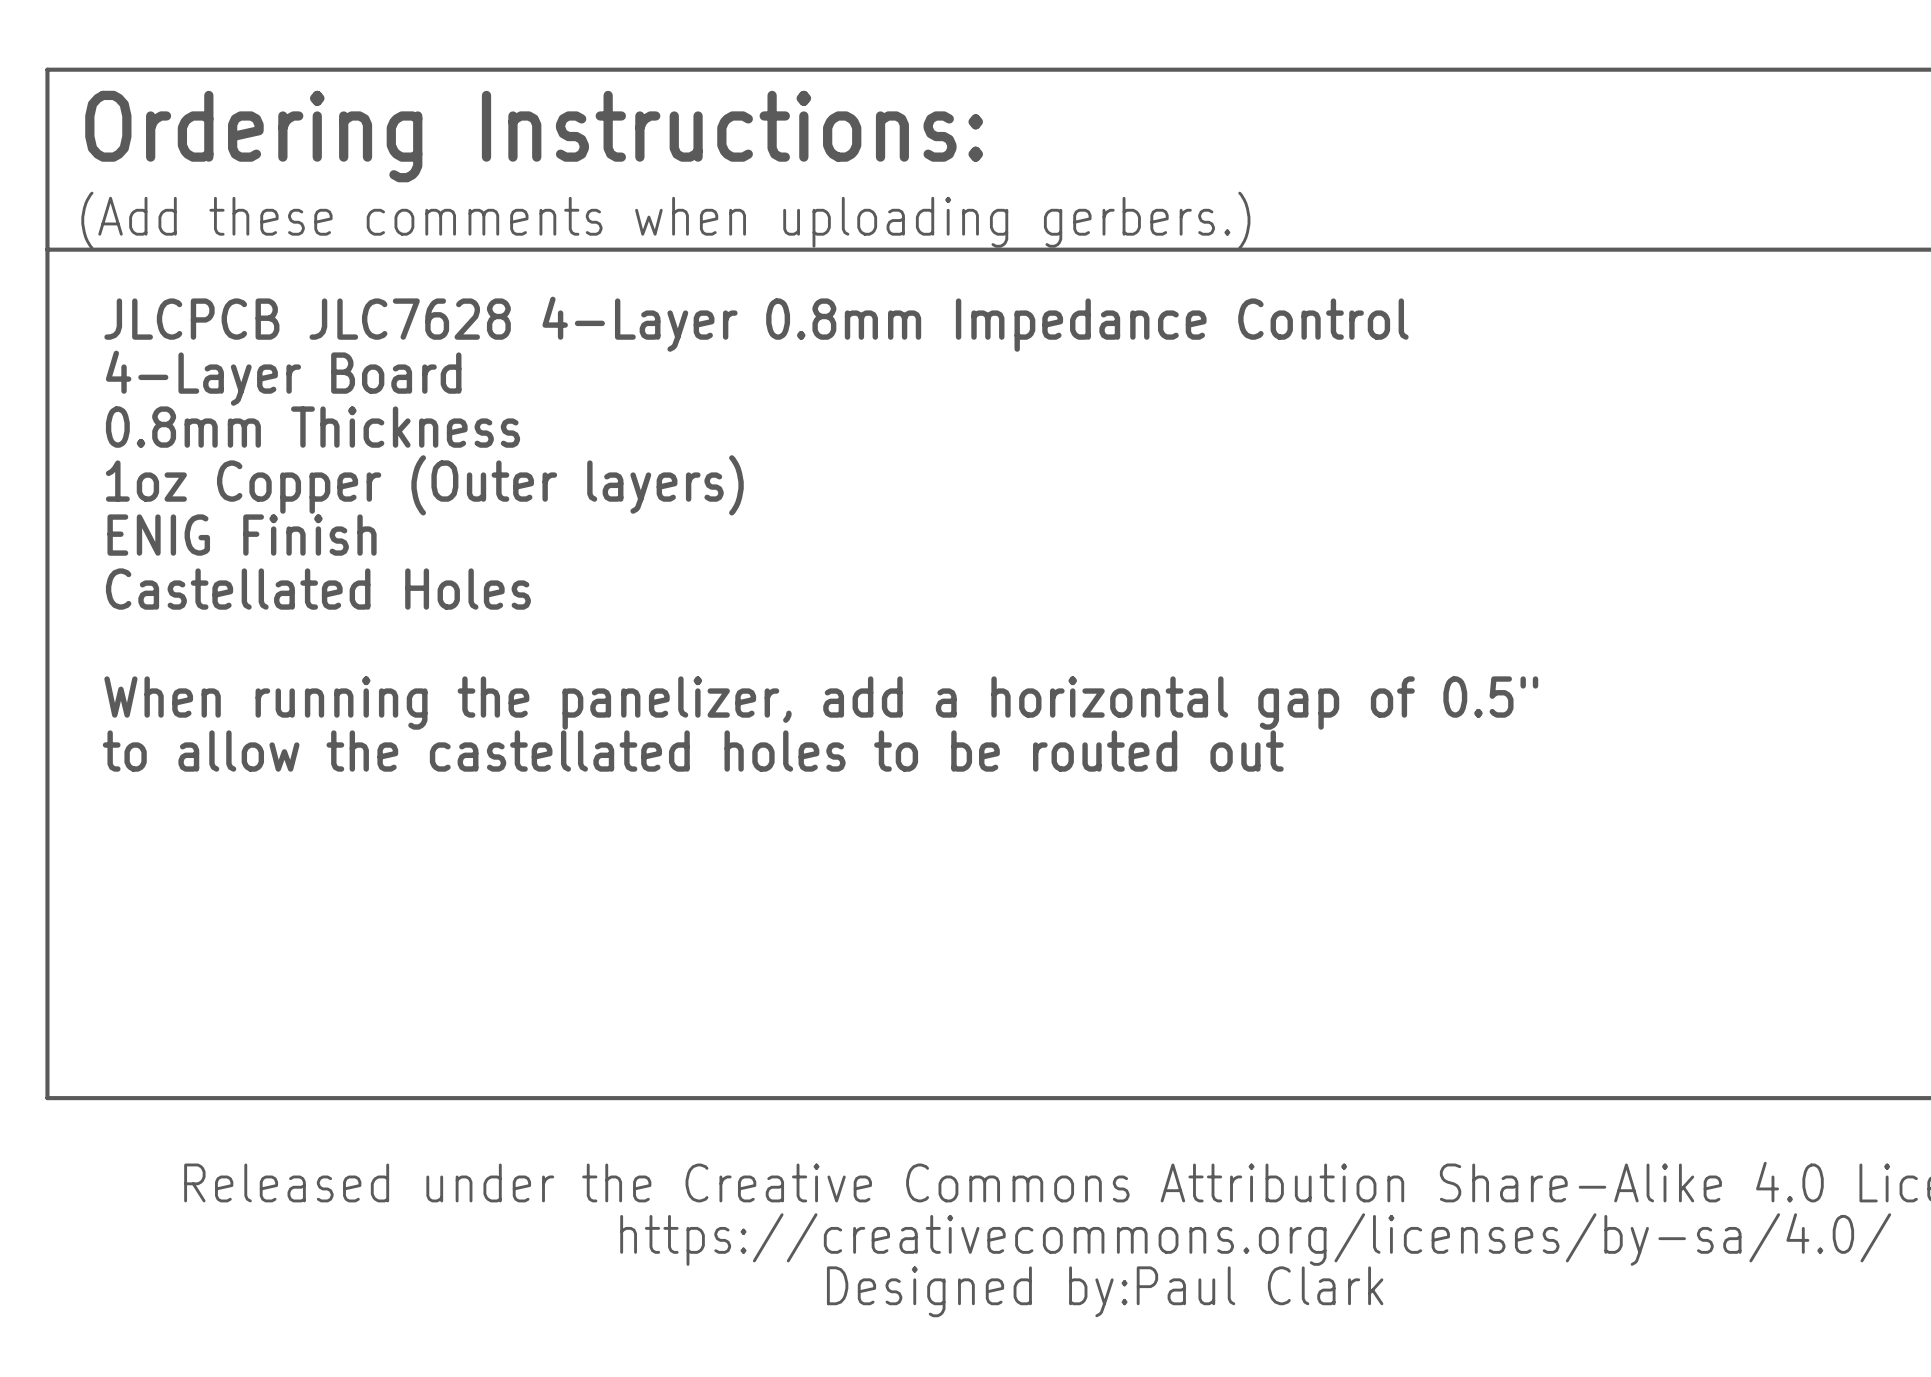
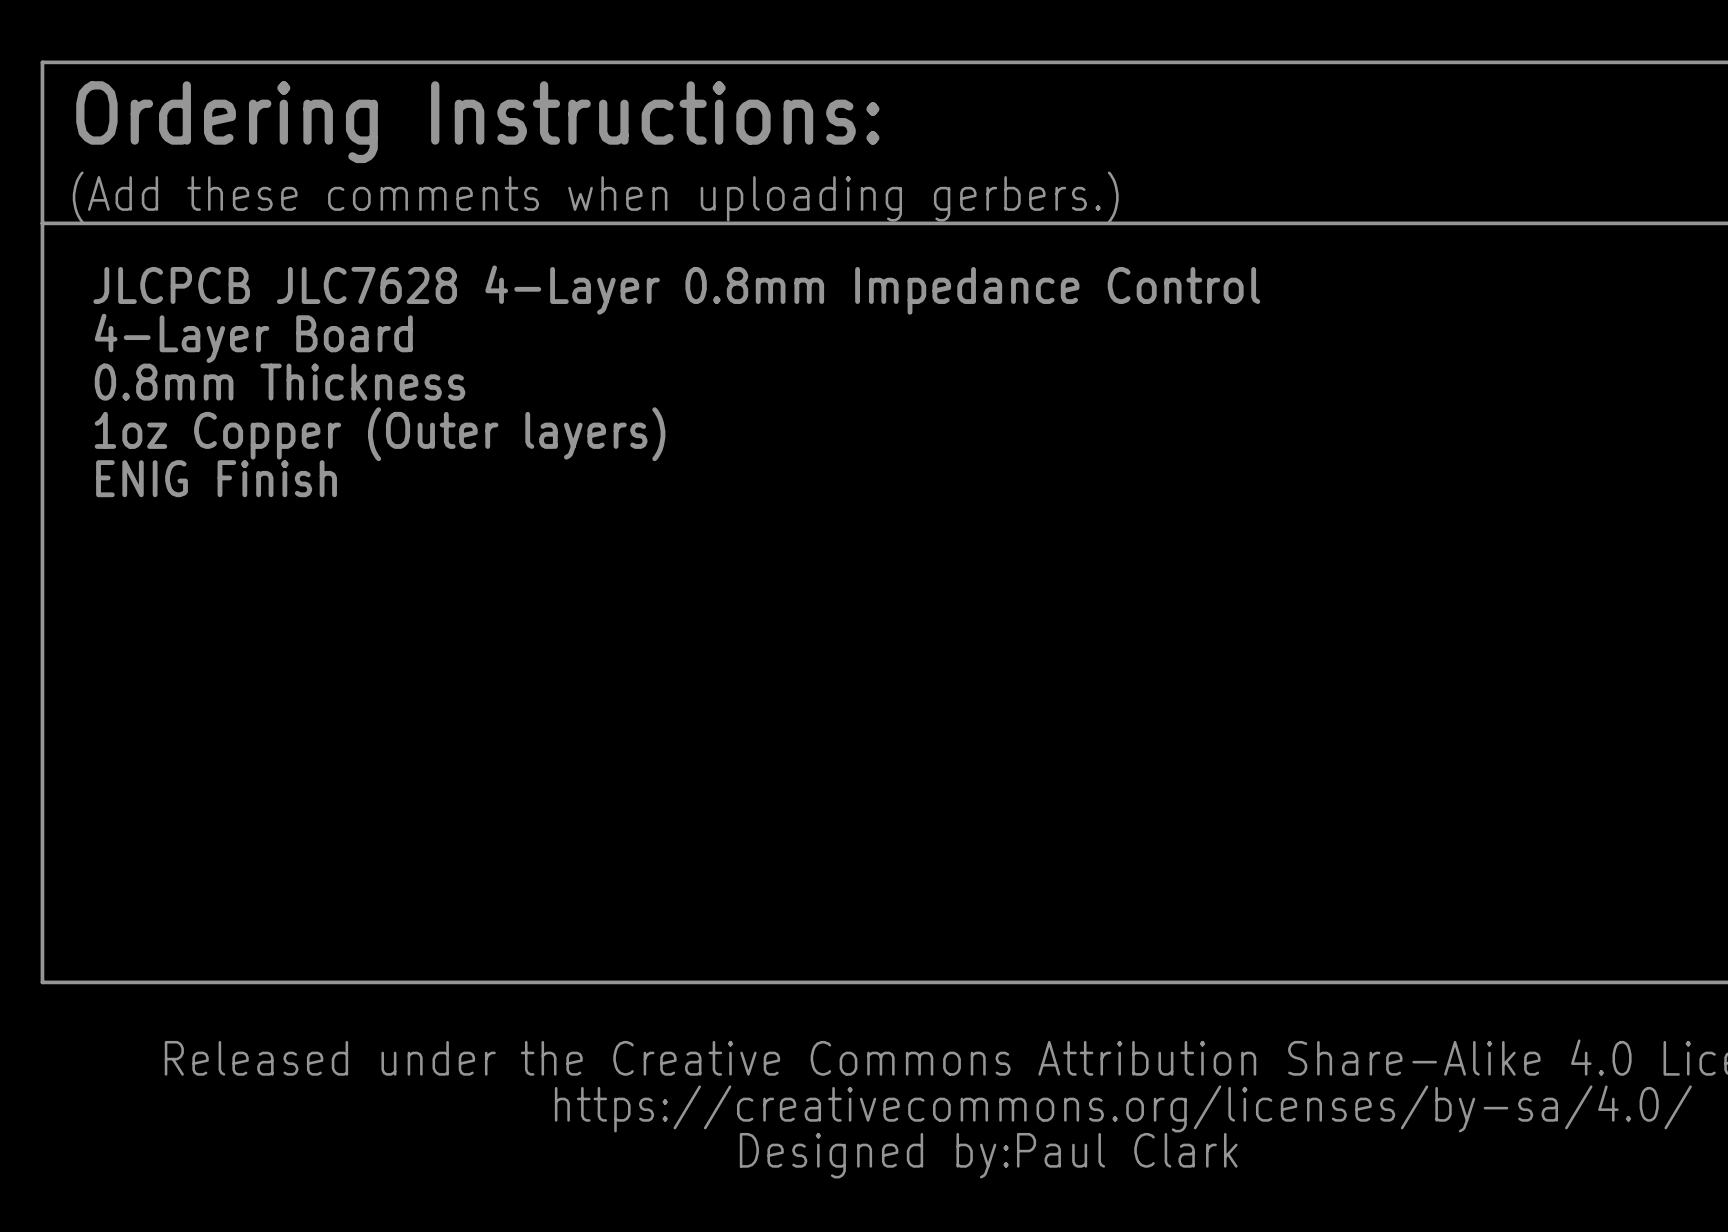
text: Castellated Holes (318, 589) -> none
text: When running the panelizer, add a horizontal gap of 0.5" (821, 703) -> none
text: to allow the castellated holes to be routed out (693, 751) -> none

